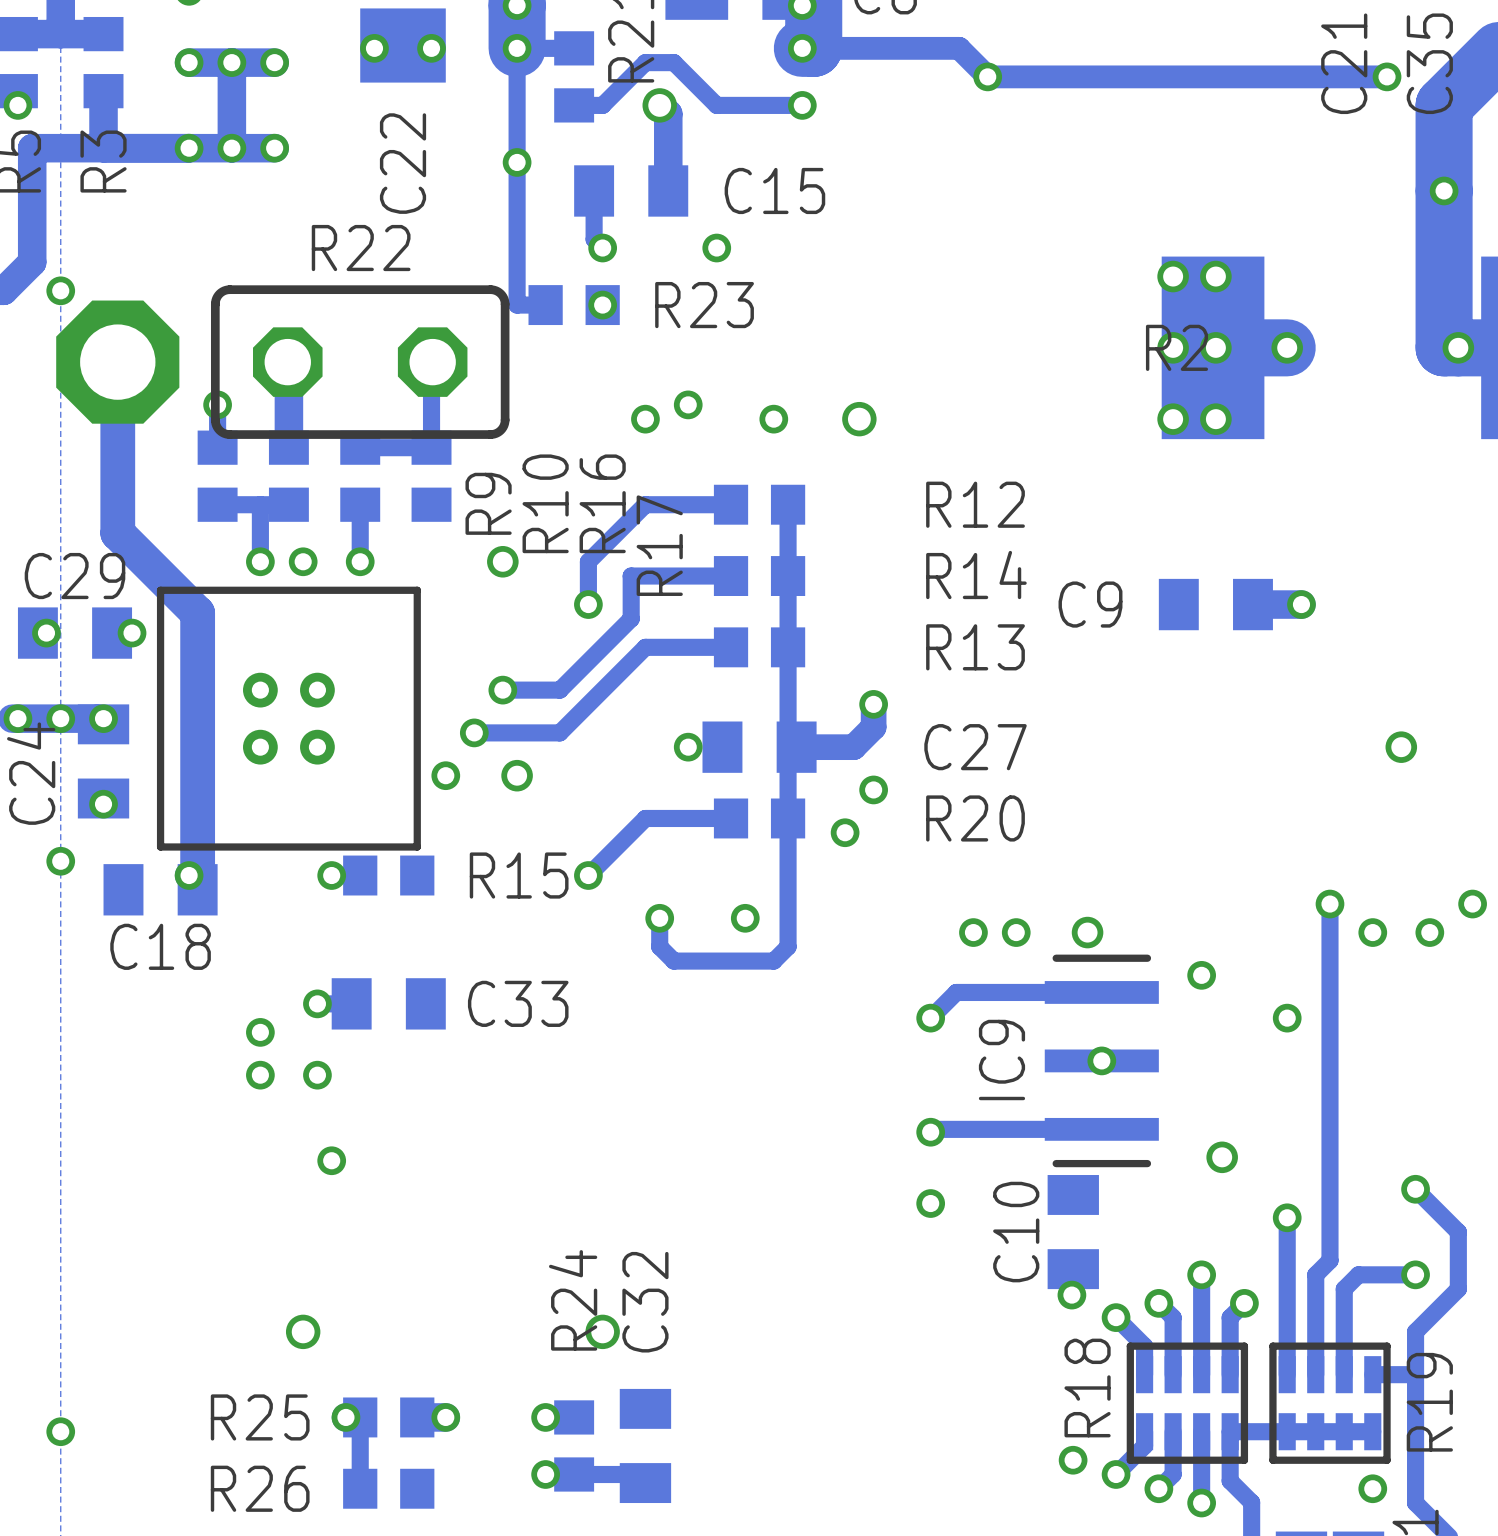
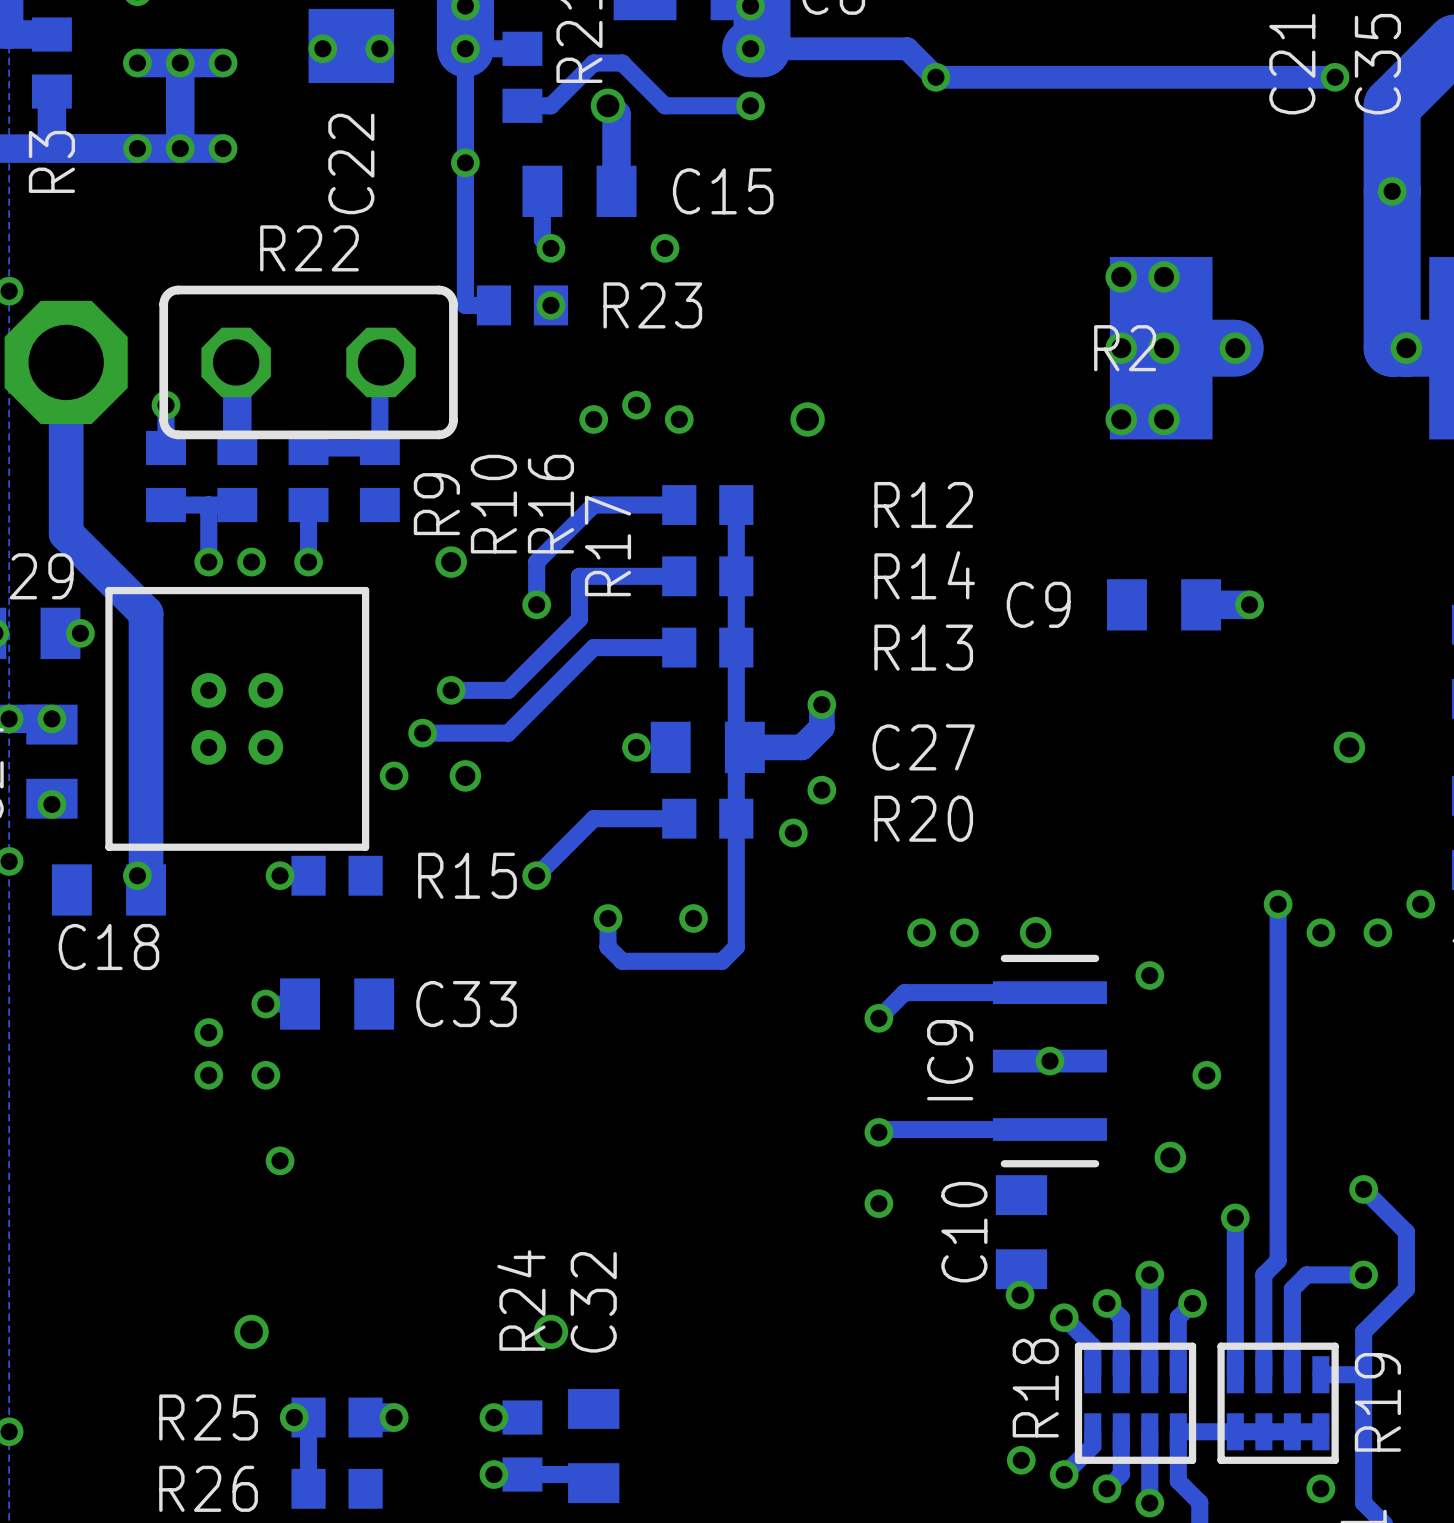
via position: (773, 419) -> (679, 419)
via position: (1287, 1018) -> (1206, 1075)

